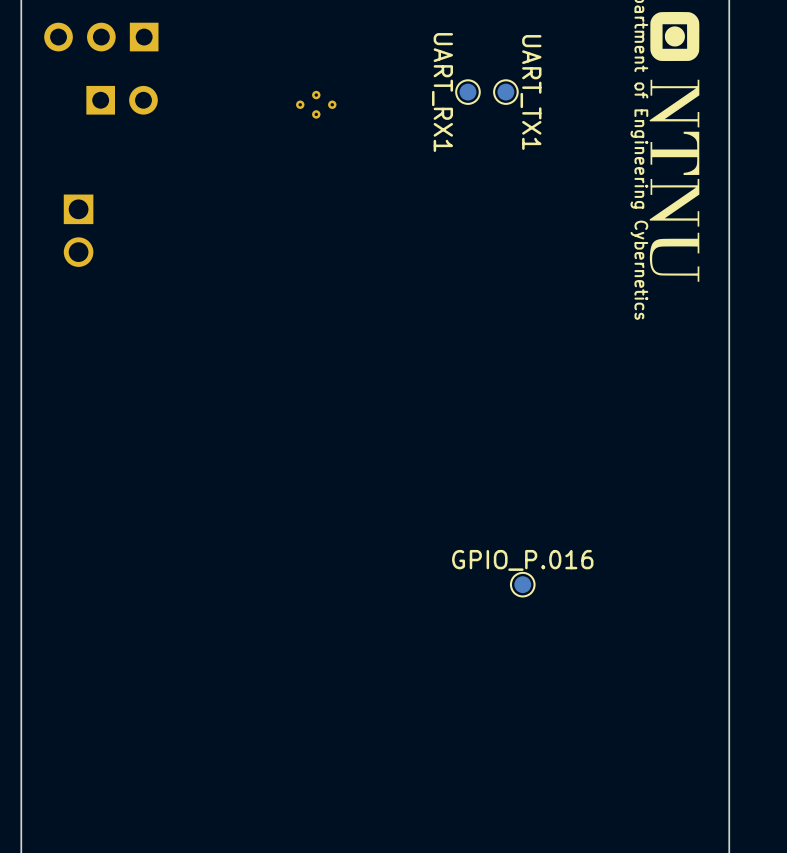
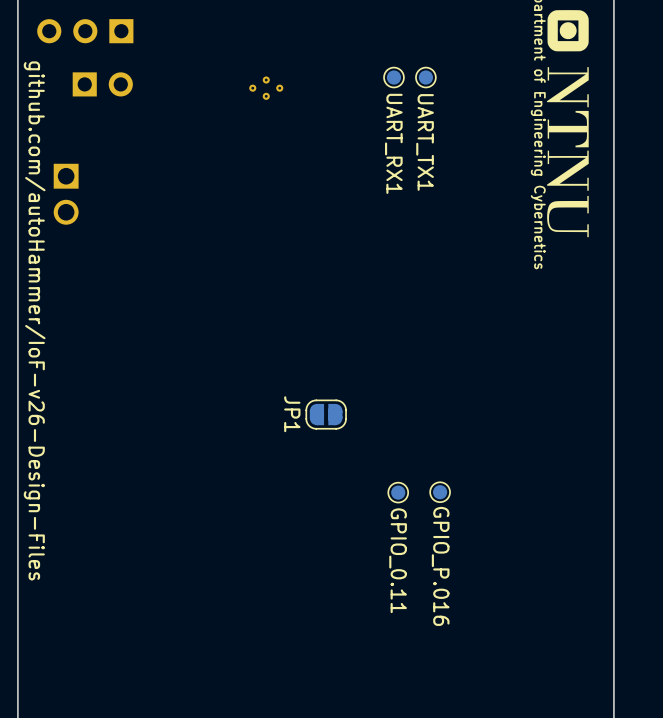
UART_RX1 name position: UART_RX1 (442, 92) -> UART_RX1 (393, 143)
UART_TX1 name position: UART_TX1 (531, 92) -> UART_TX1 (425, 142)
text: none -> github.com/autoHammer/IoF-v26-Design-Files (34, 320)
JP1: none -> (326, 414)
GPIO_P.016 name rotation: 0° (522, 560) -> 90° clockwise (440, 566)
GPIO_0.11: none -> (398, 492)

